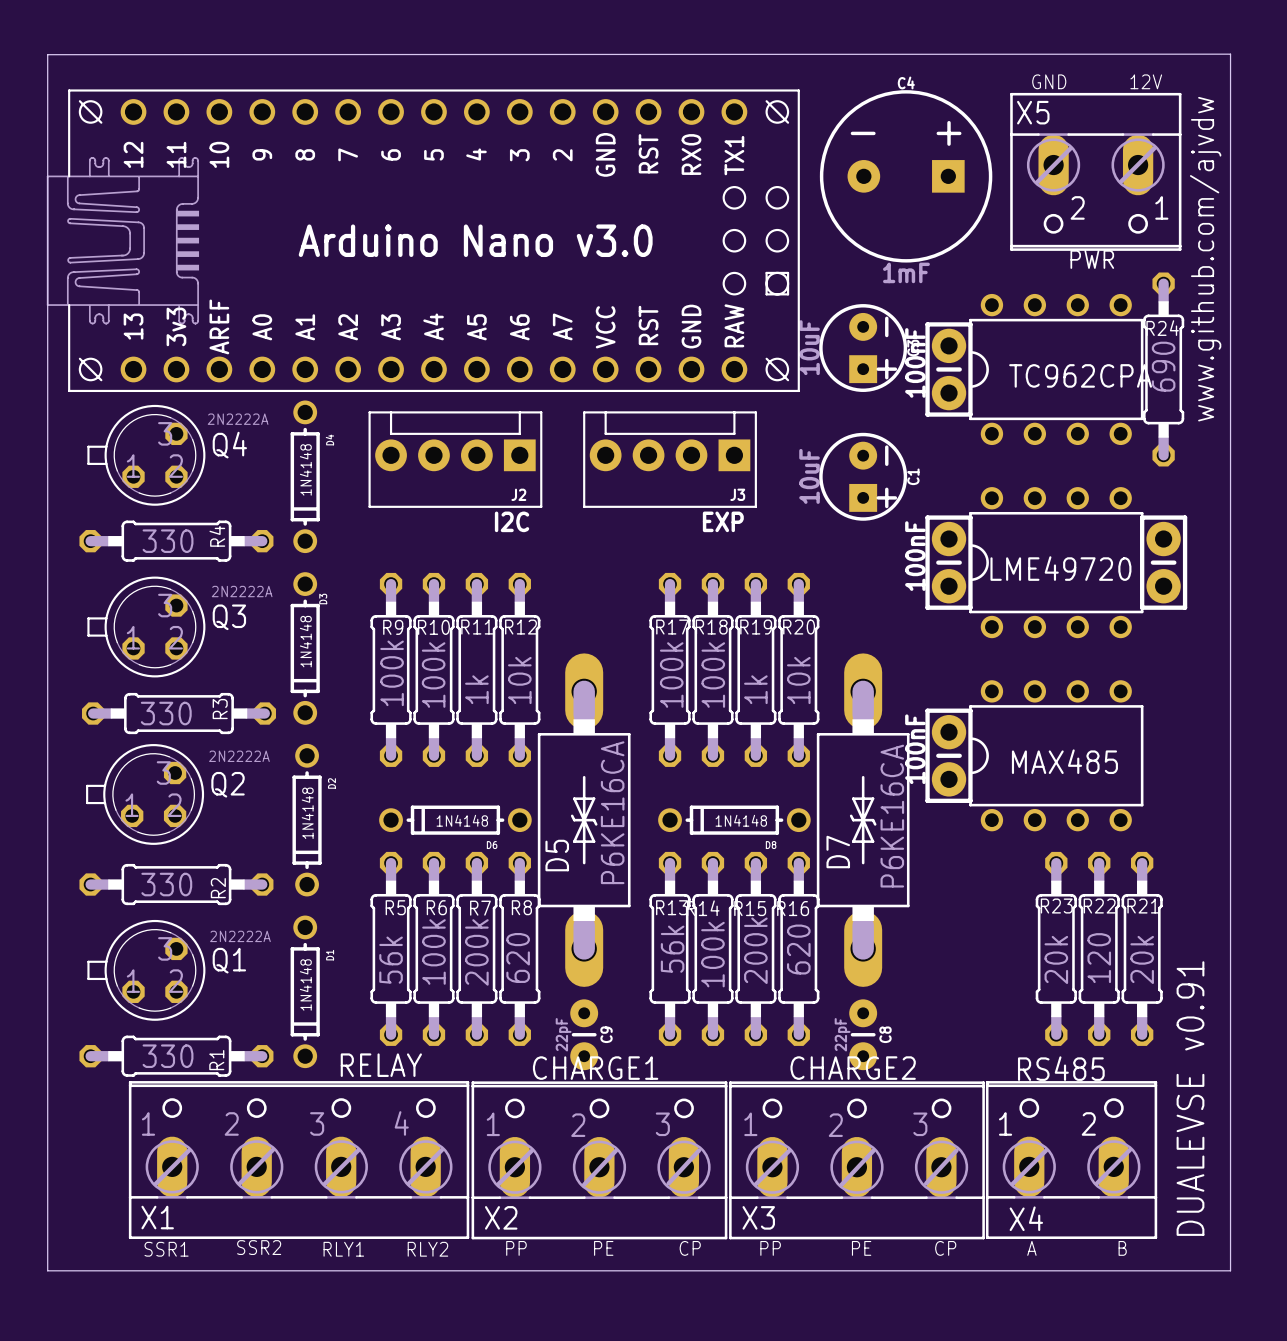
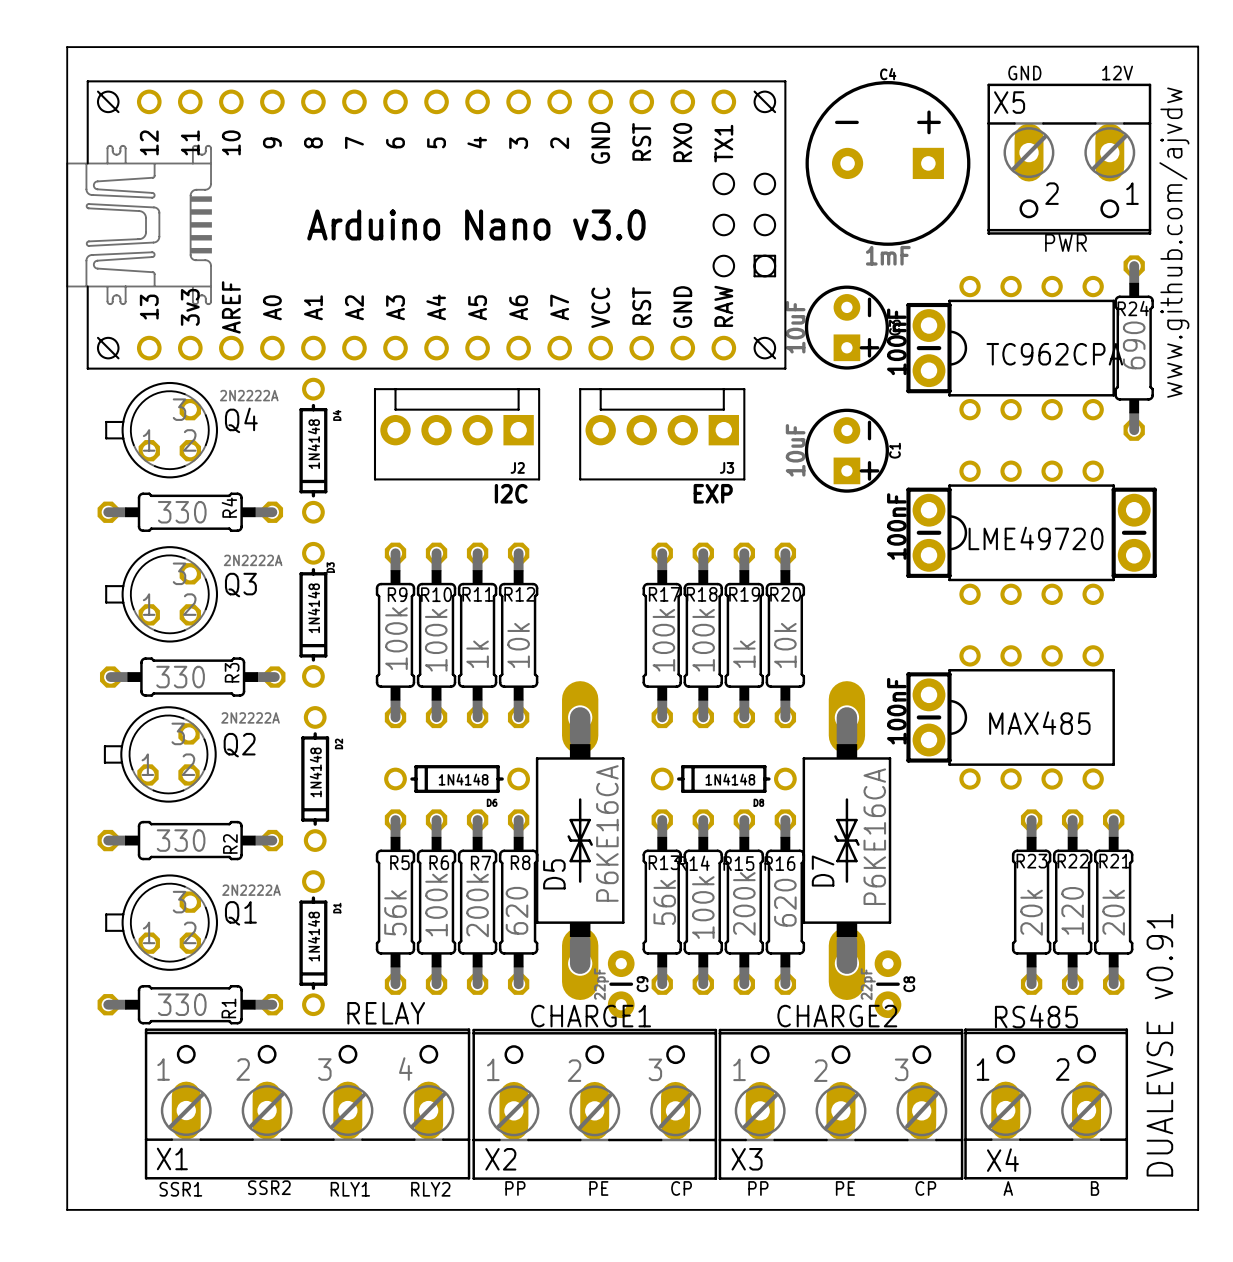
D5 position: (584, 820) -> (580, 840)
D7 position: (863, 820) -> (846, 840)
C9 position: (584, 1034) -> (621, 984)
C8 position: (863, 1034) -> (887, 984)

